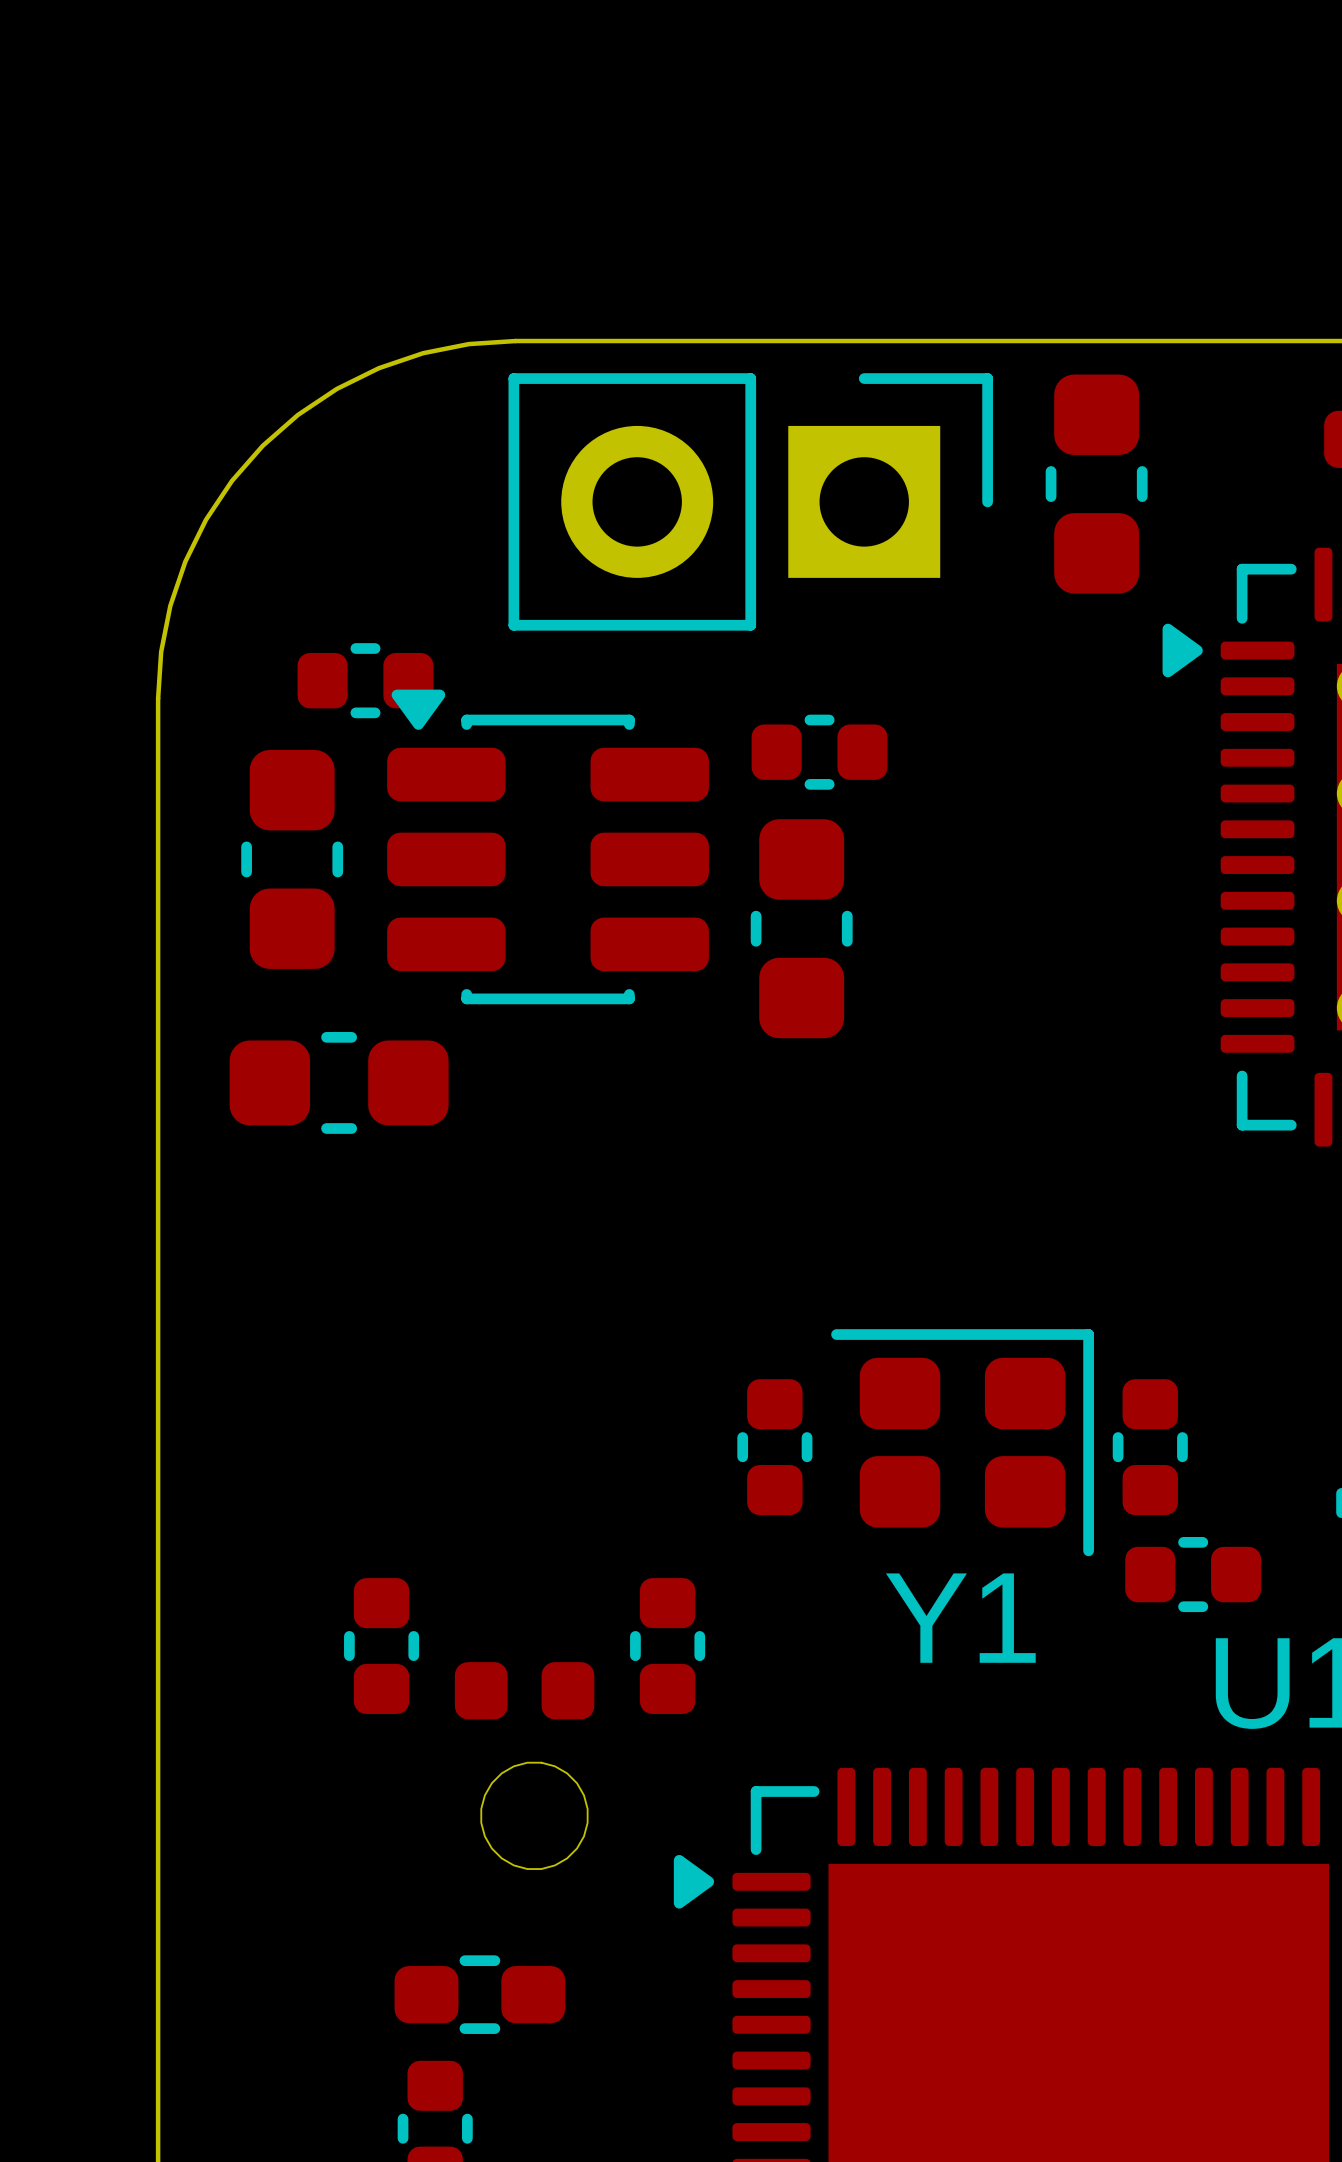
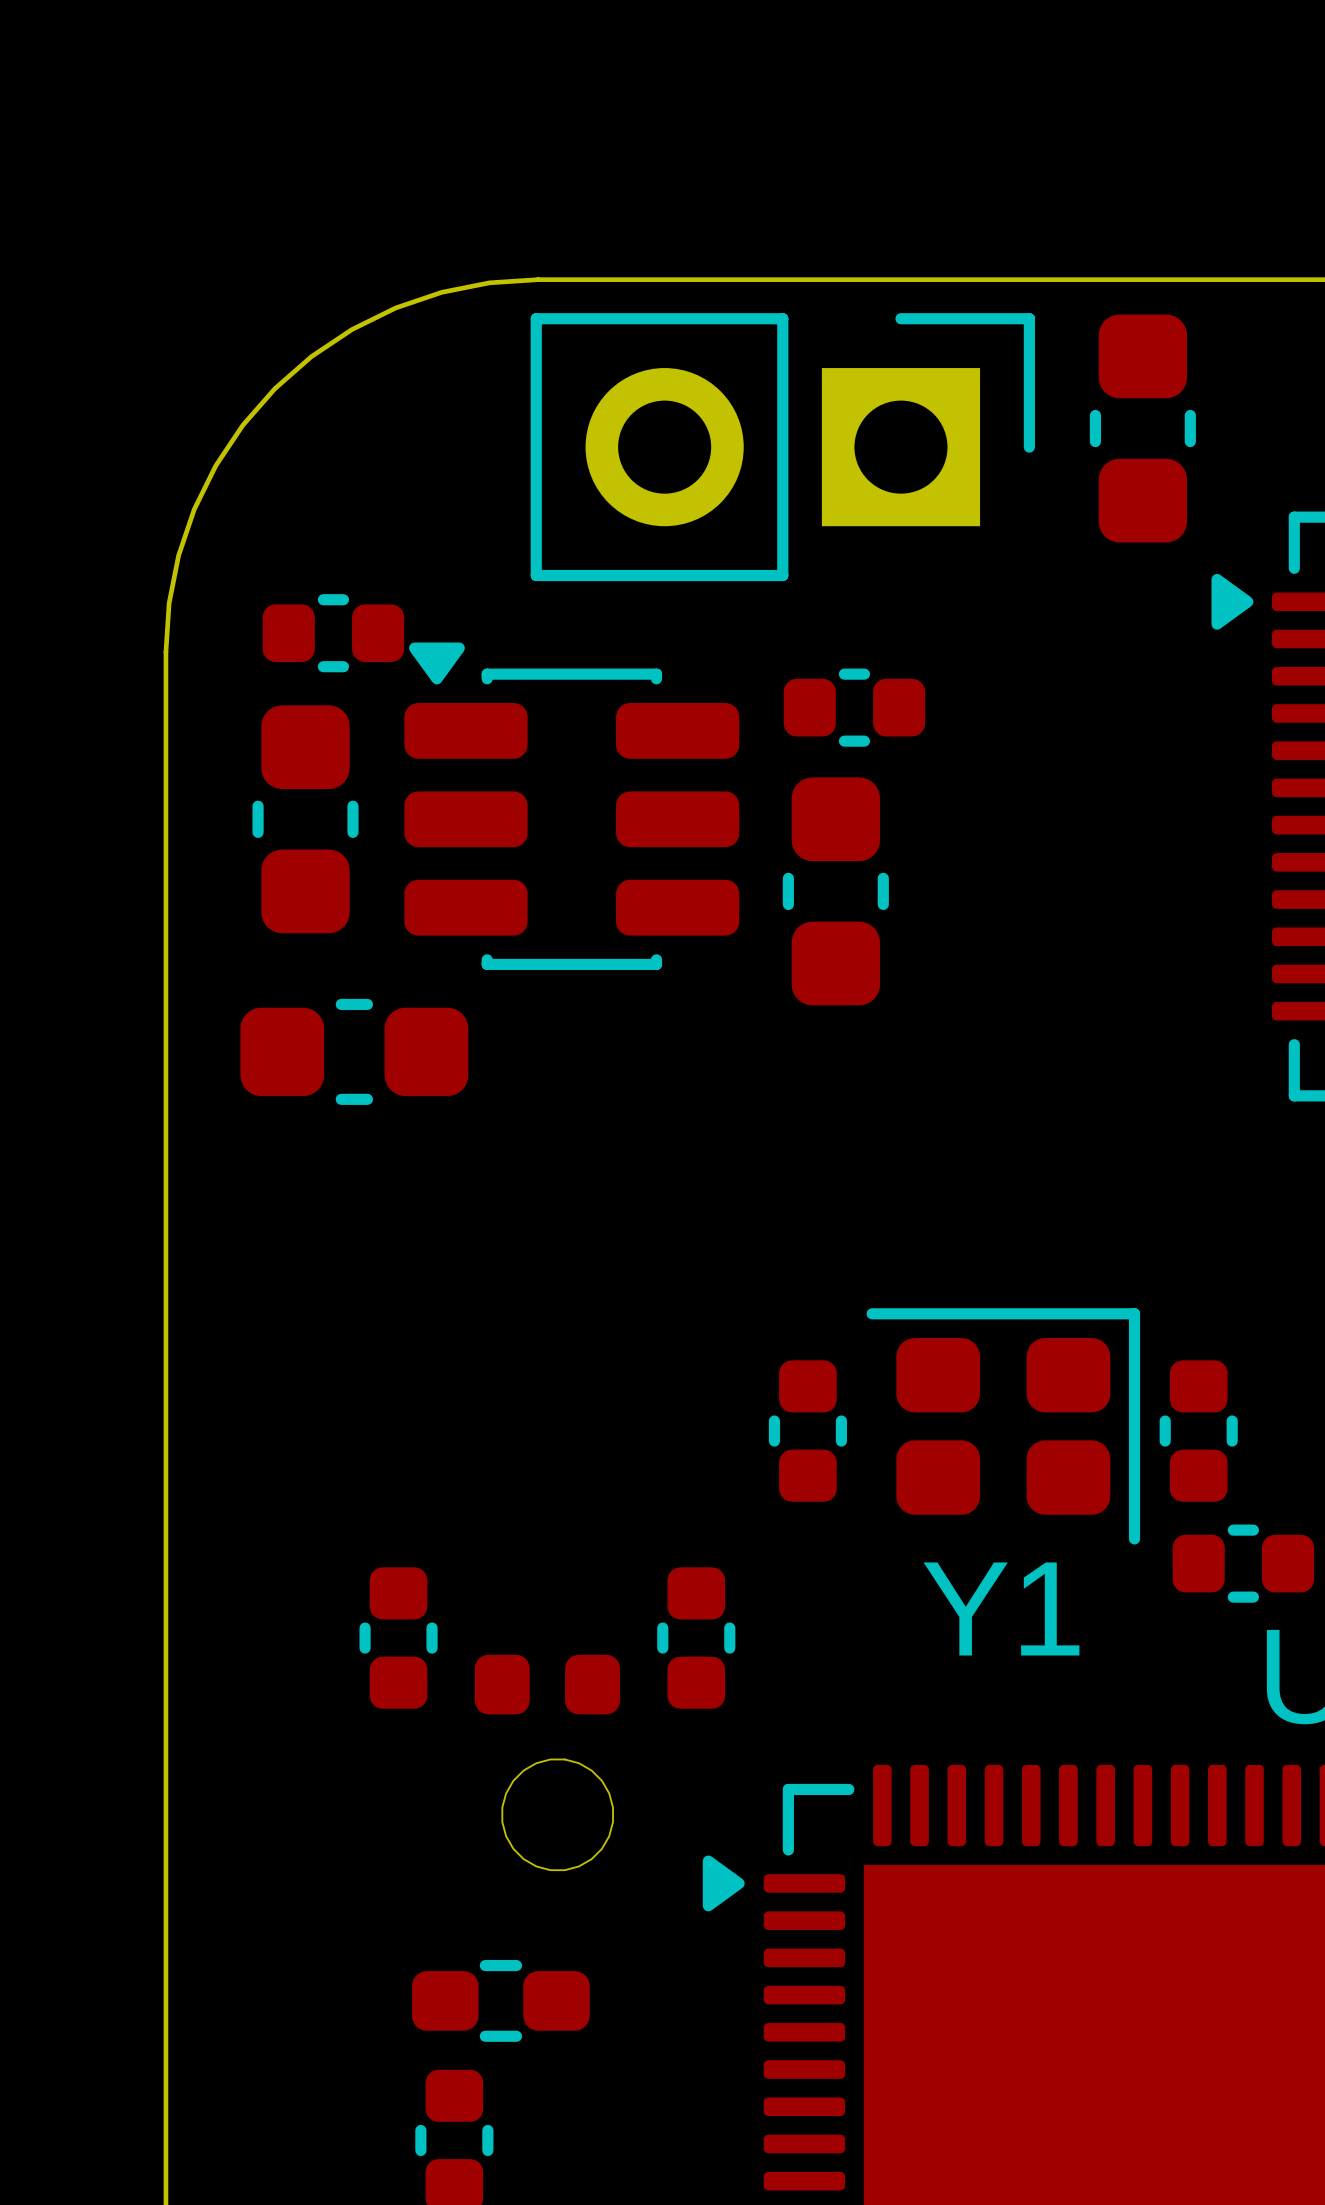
part position: (365, 680) -> (333, 633)

